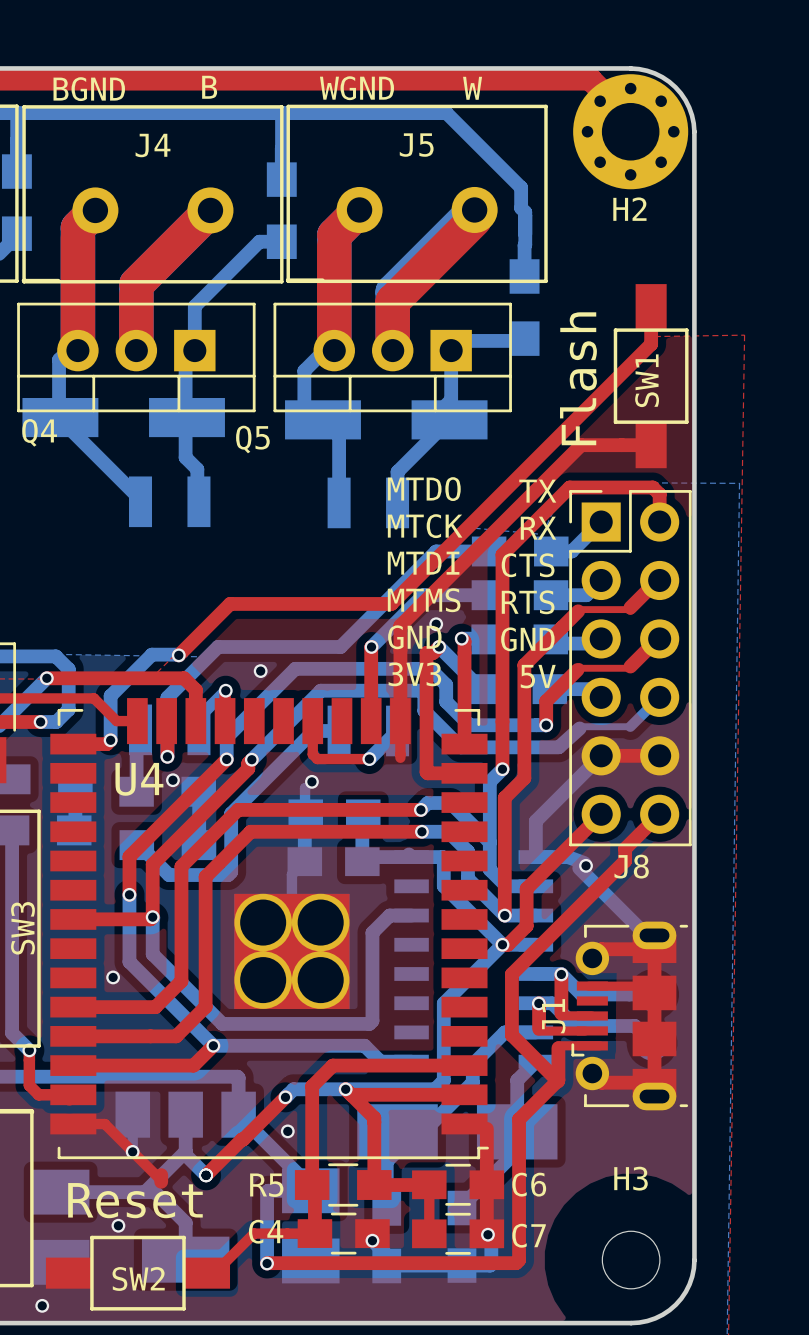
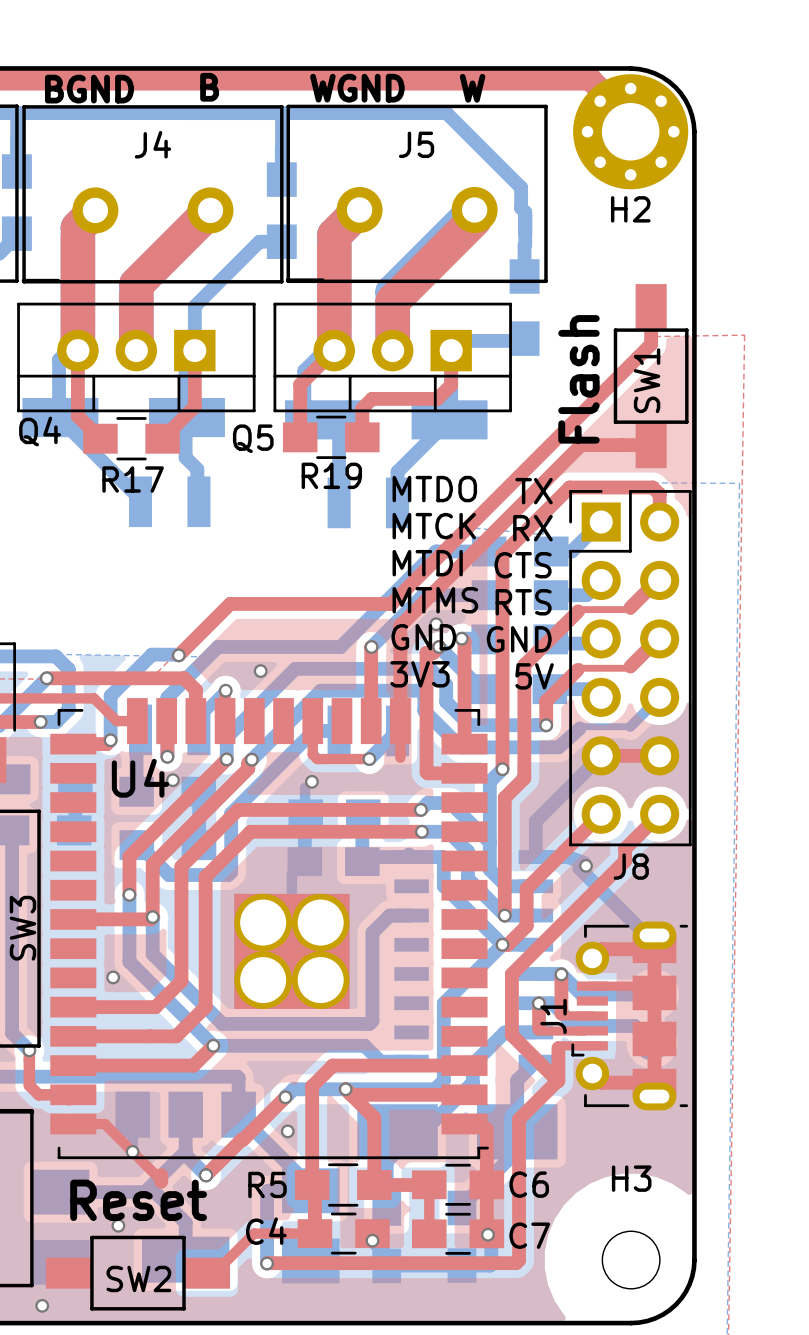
top track: none -> (77, 350) (77, 416) (100, 438)
top track: none -> (194, 350) (194, 406) (162, 438)
top track: none -> (334, 350) (300, 384) (300, 437)
top track: none -> (451, 350) (451, 385) (437, 398) (372, 398) (362, 408) (362, 437)
R19: none -> (331, 437)
R17: none -> (131, 438)

